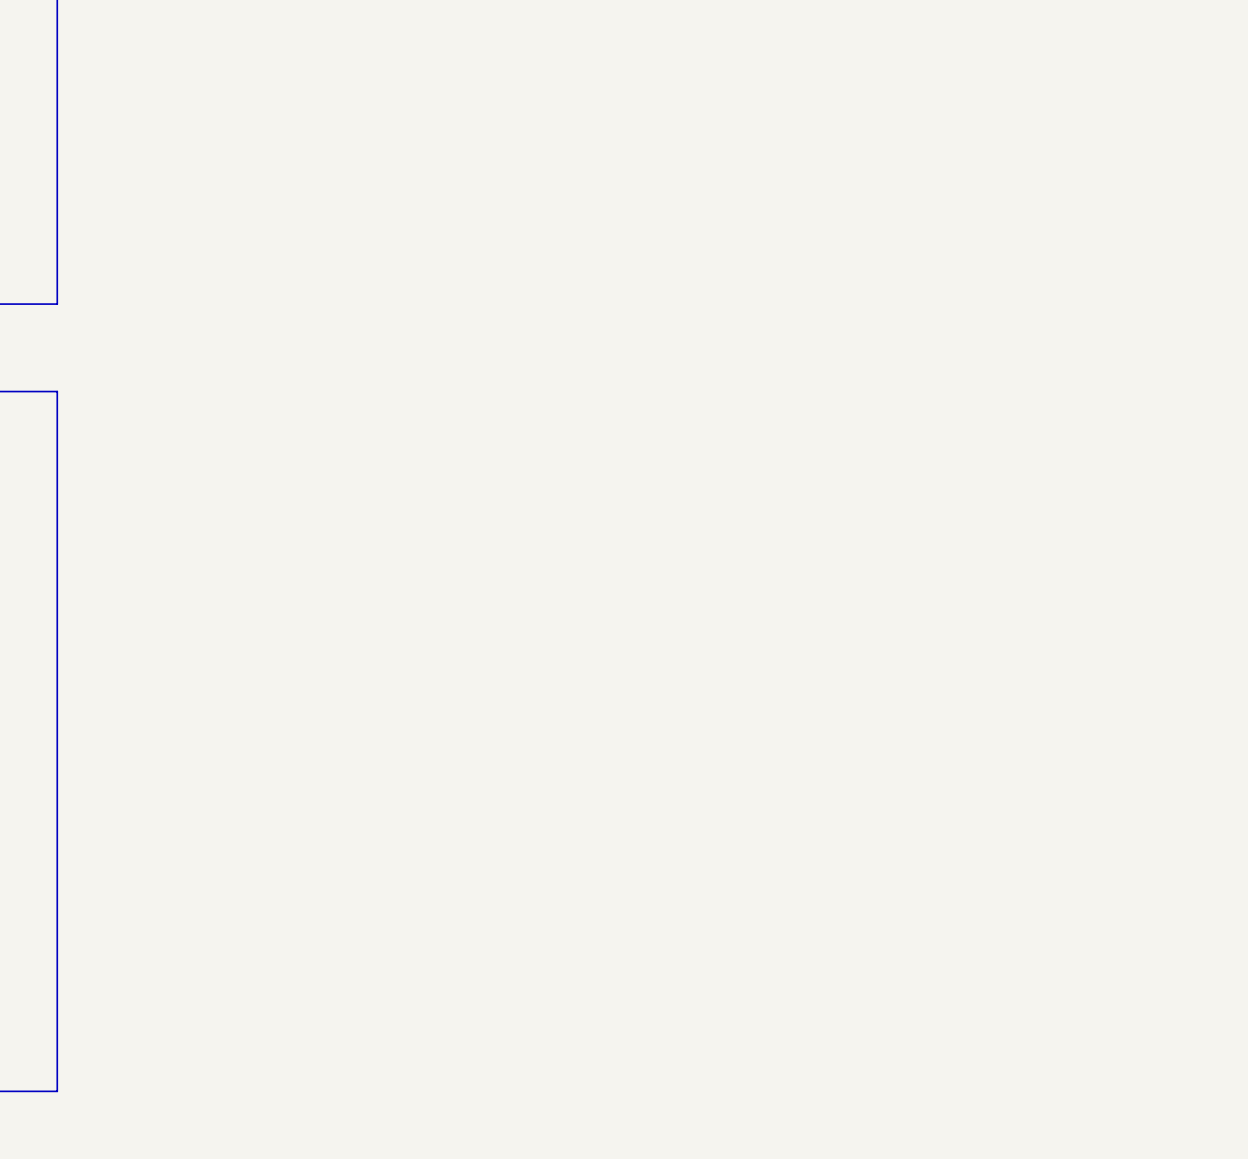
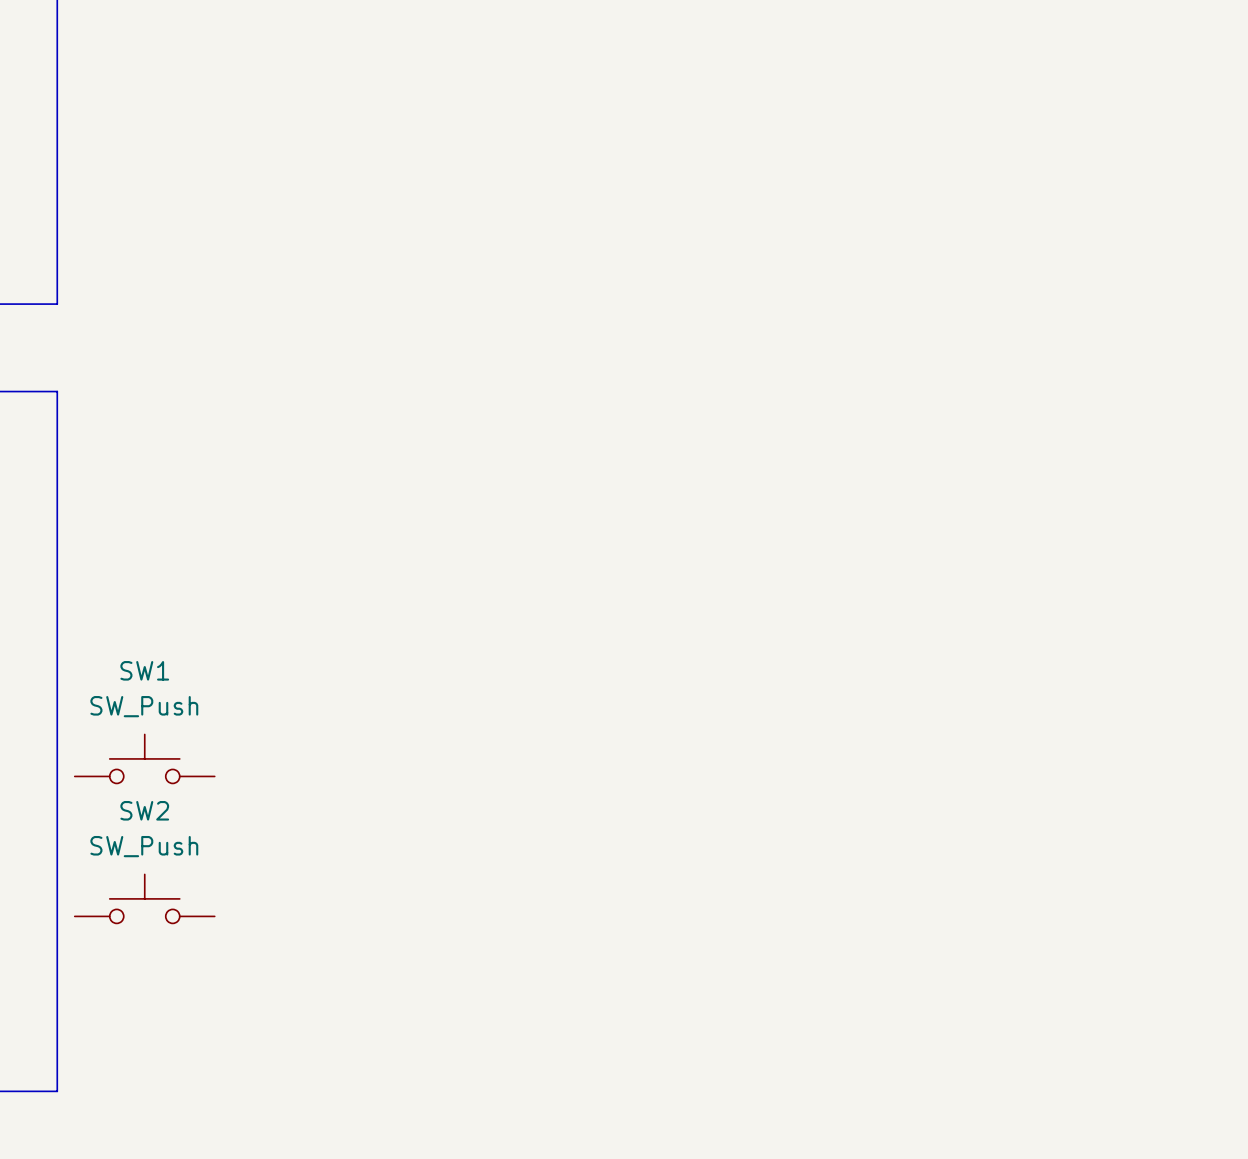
SW1: none -> SW_Push (144, 758)
SW2: none -> SW_Push (144, 898)

